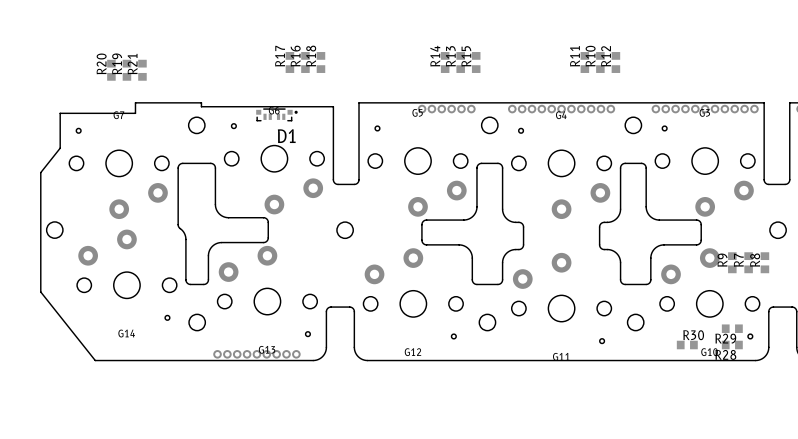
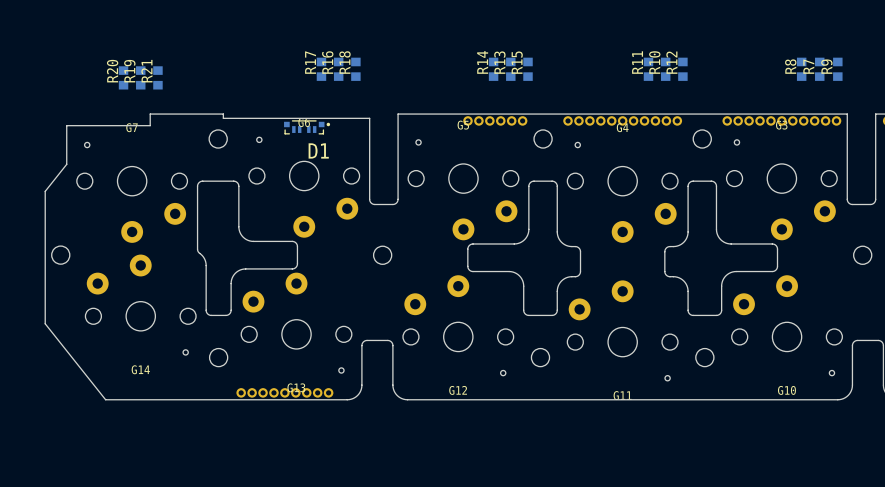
R9 position: (732, 262) -> (837, 69)
R7 position: (748, 262) -> (819, 69)
R8 position: (764, 262) -> (801, 69)
R29: (732, 328) -> none
R30: (687, 345) -> none
R28: (732, 345) -> none

